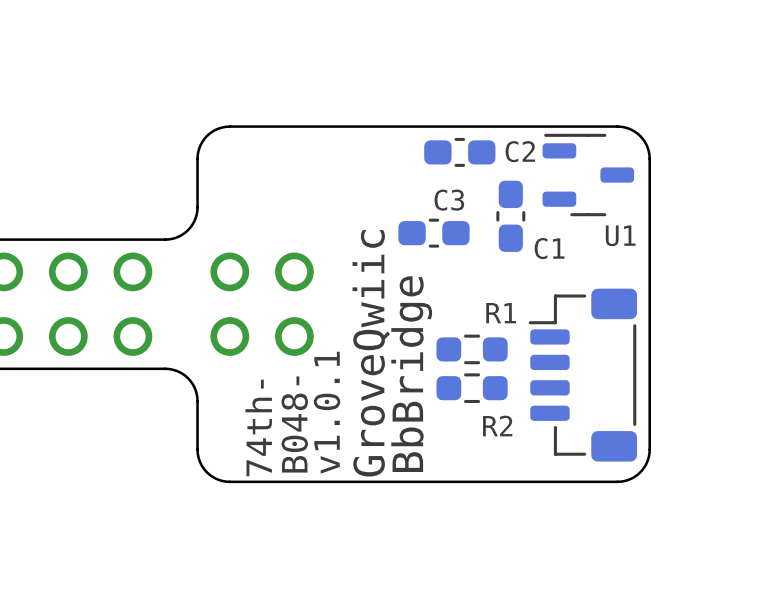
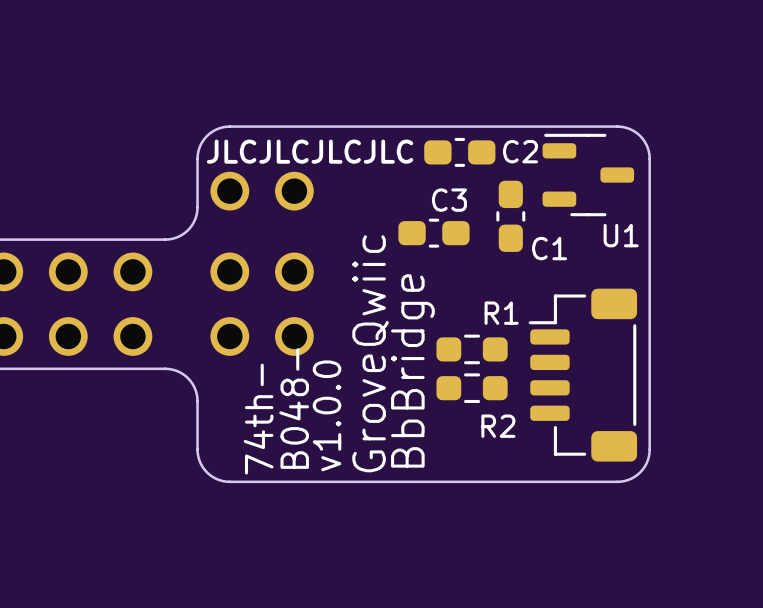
drawing: none -> [206, 139, 414, 164]
part: none -> (262, 191)
text: v1.0.1 (327, 412) -> v1.0.0 (327, 415)

